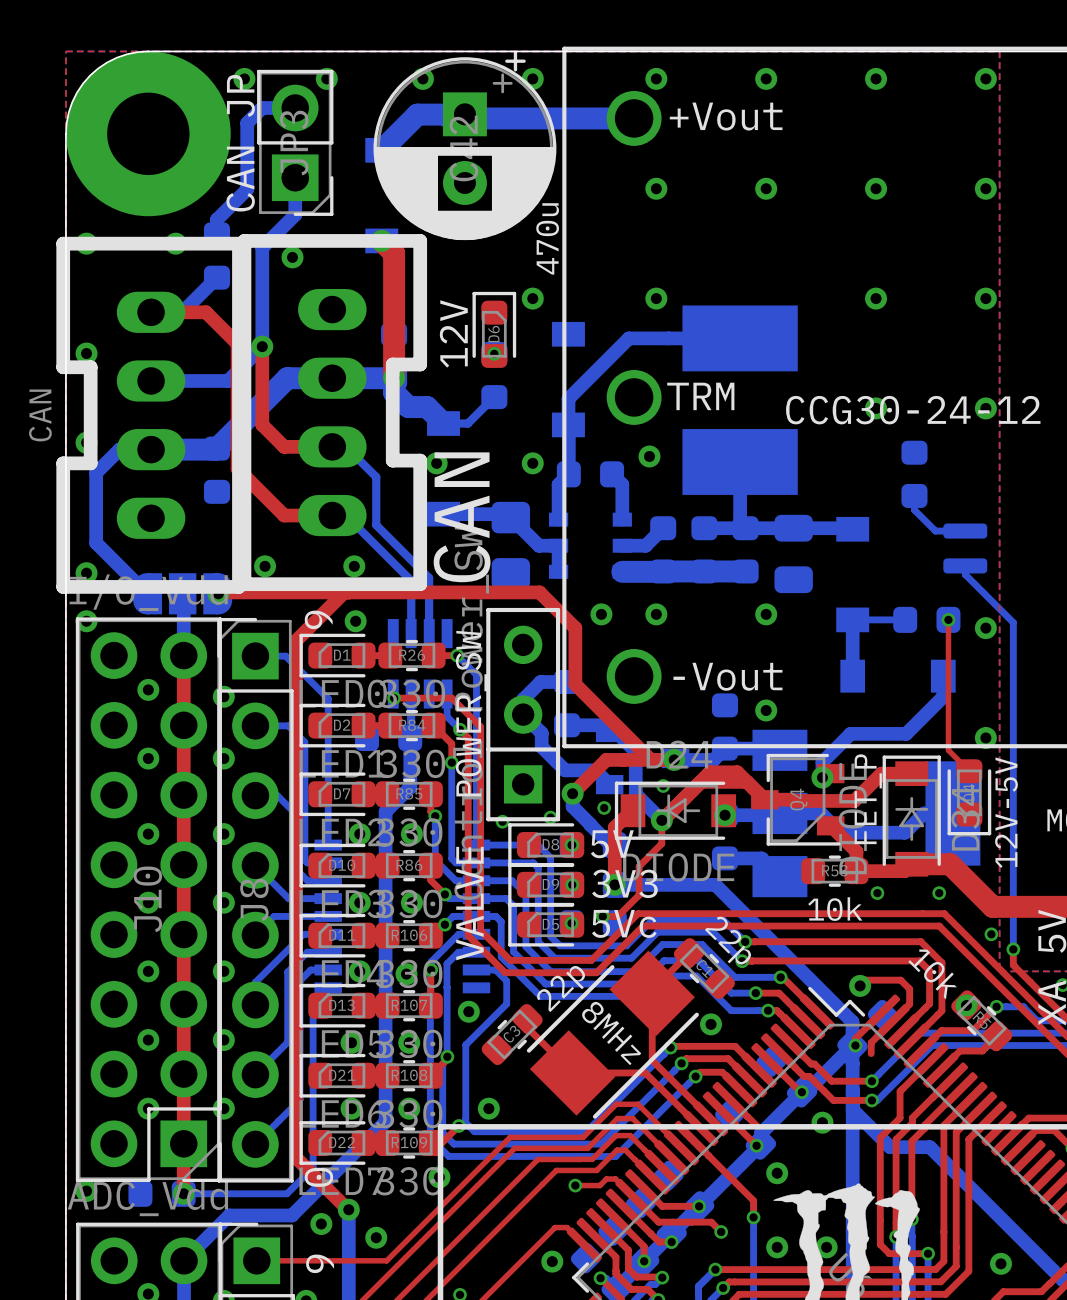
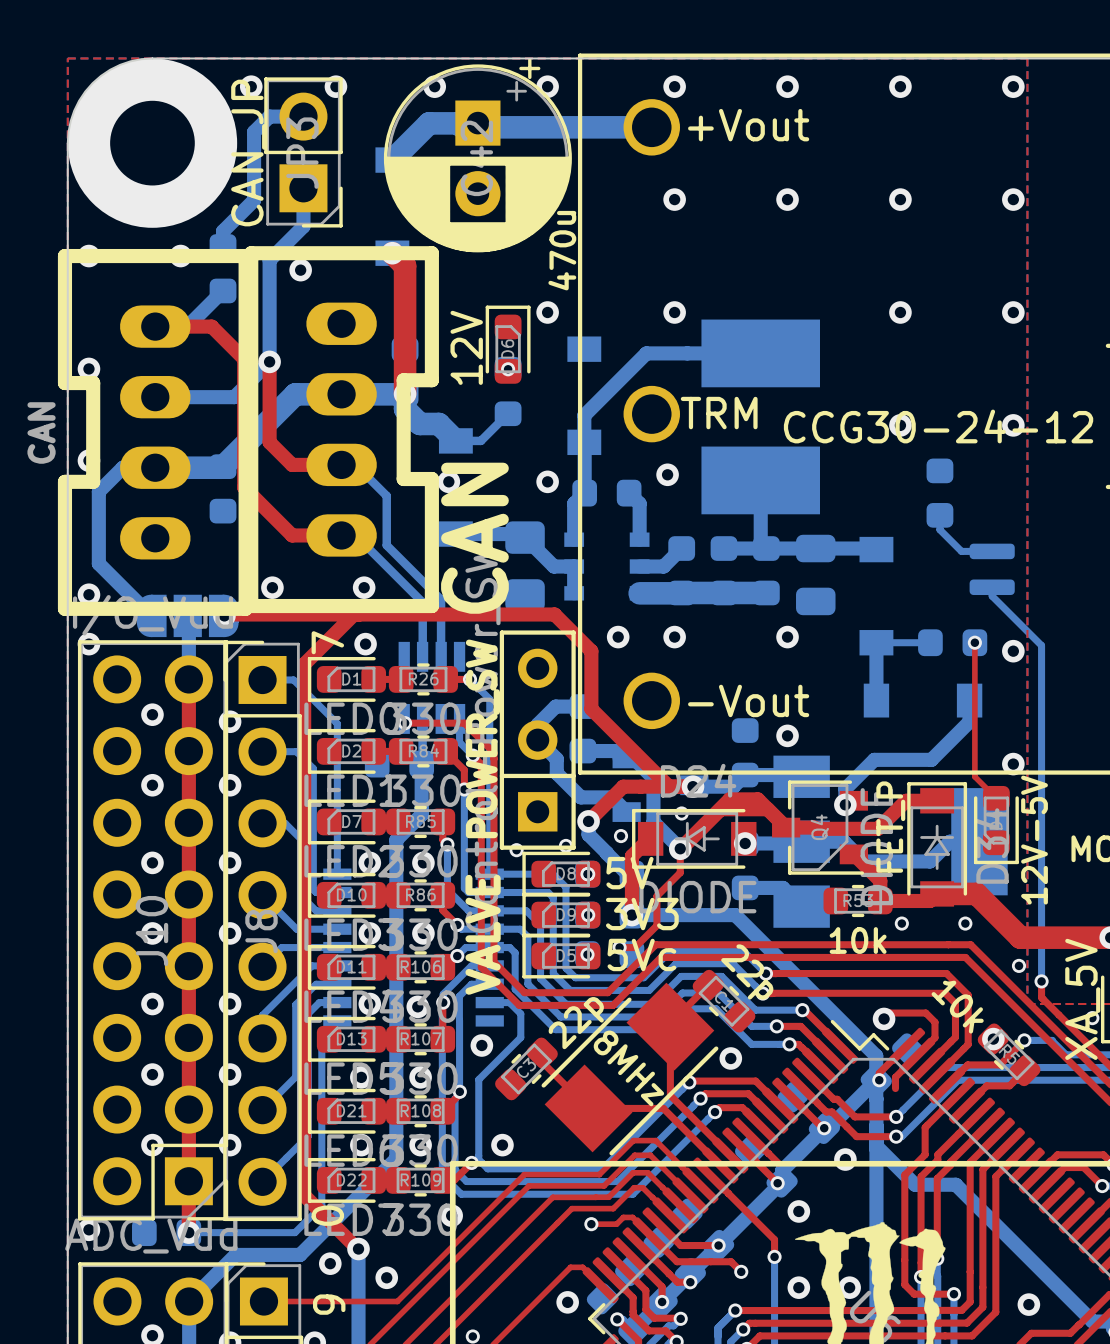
text: 9 (318, 619) -> 7 (327, 642)

